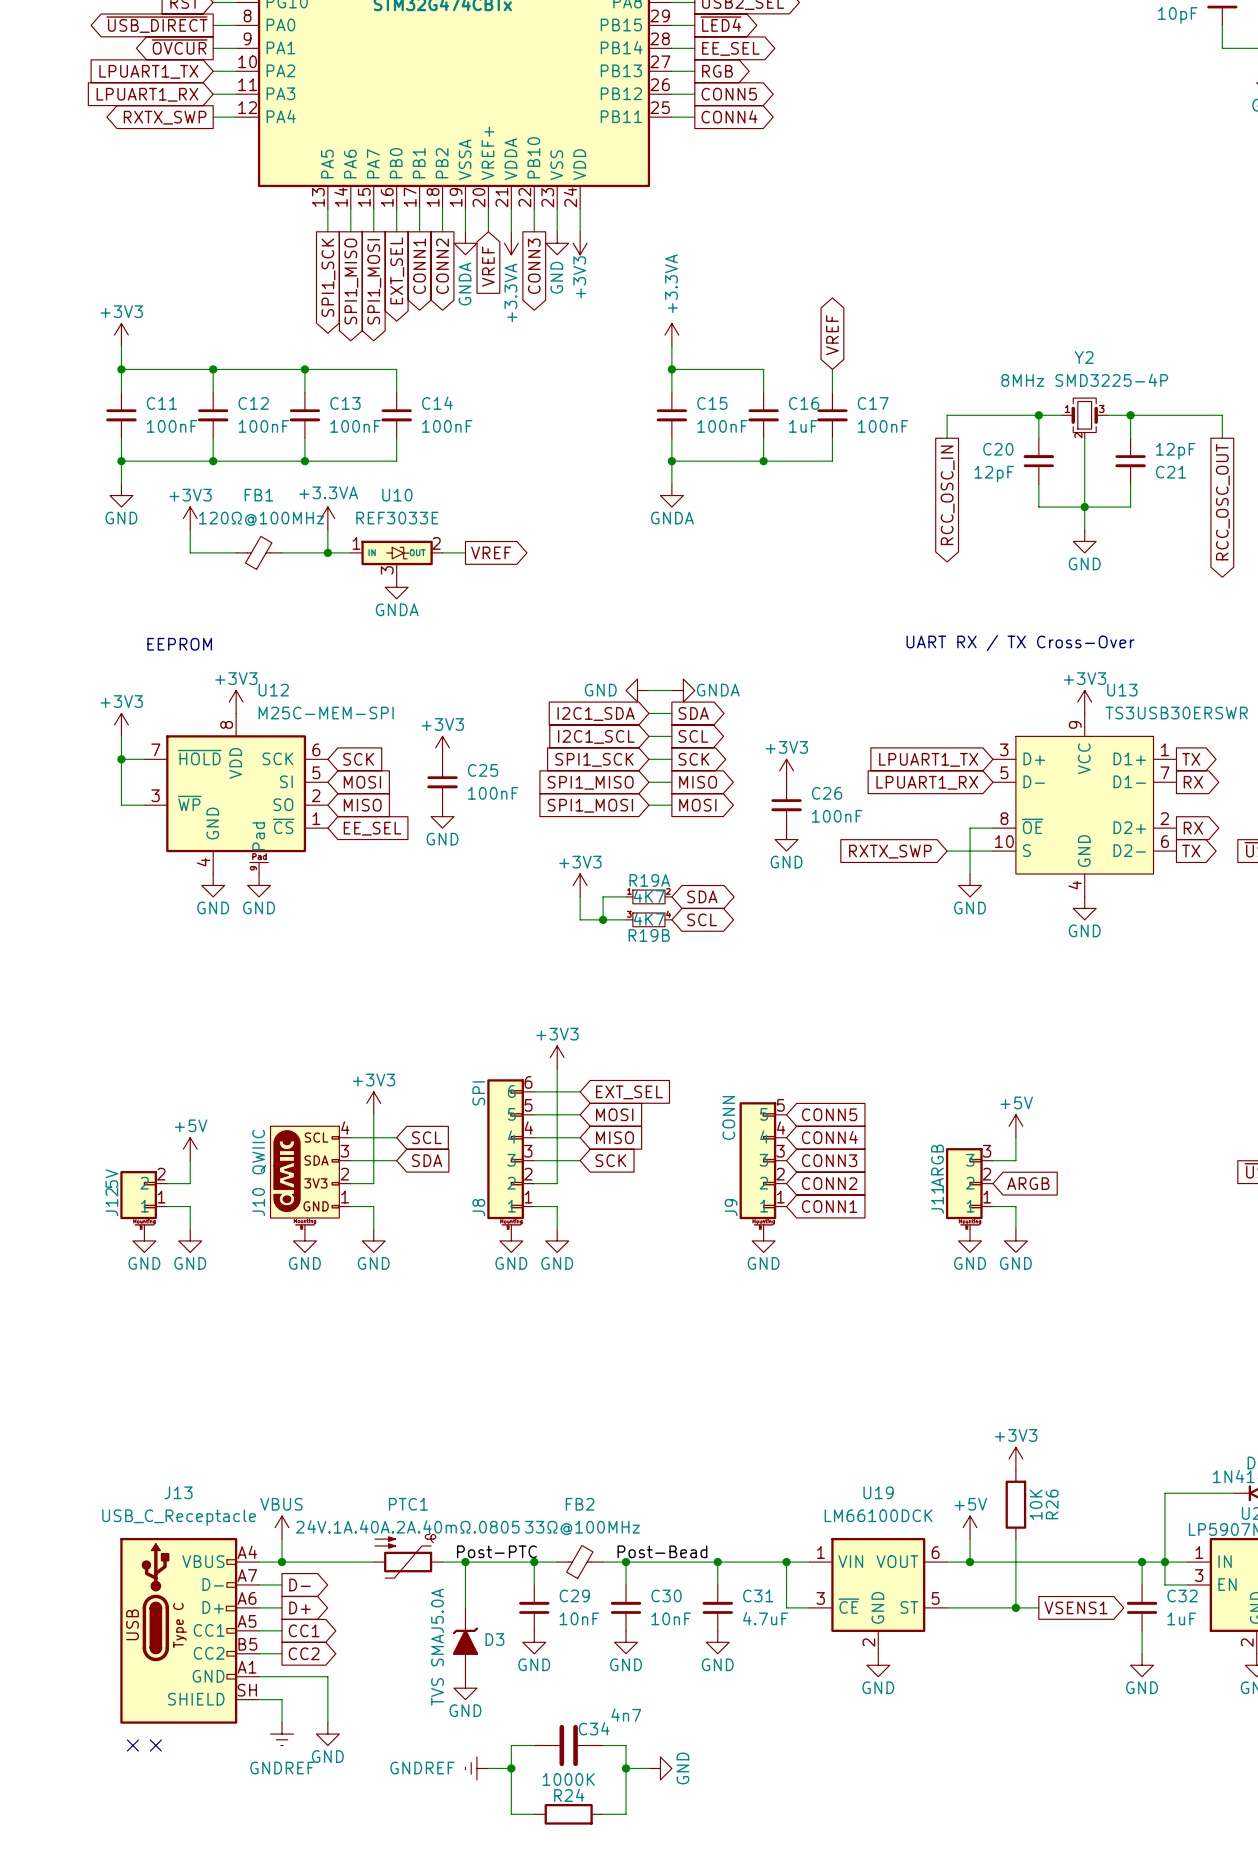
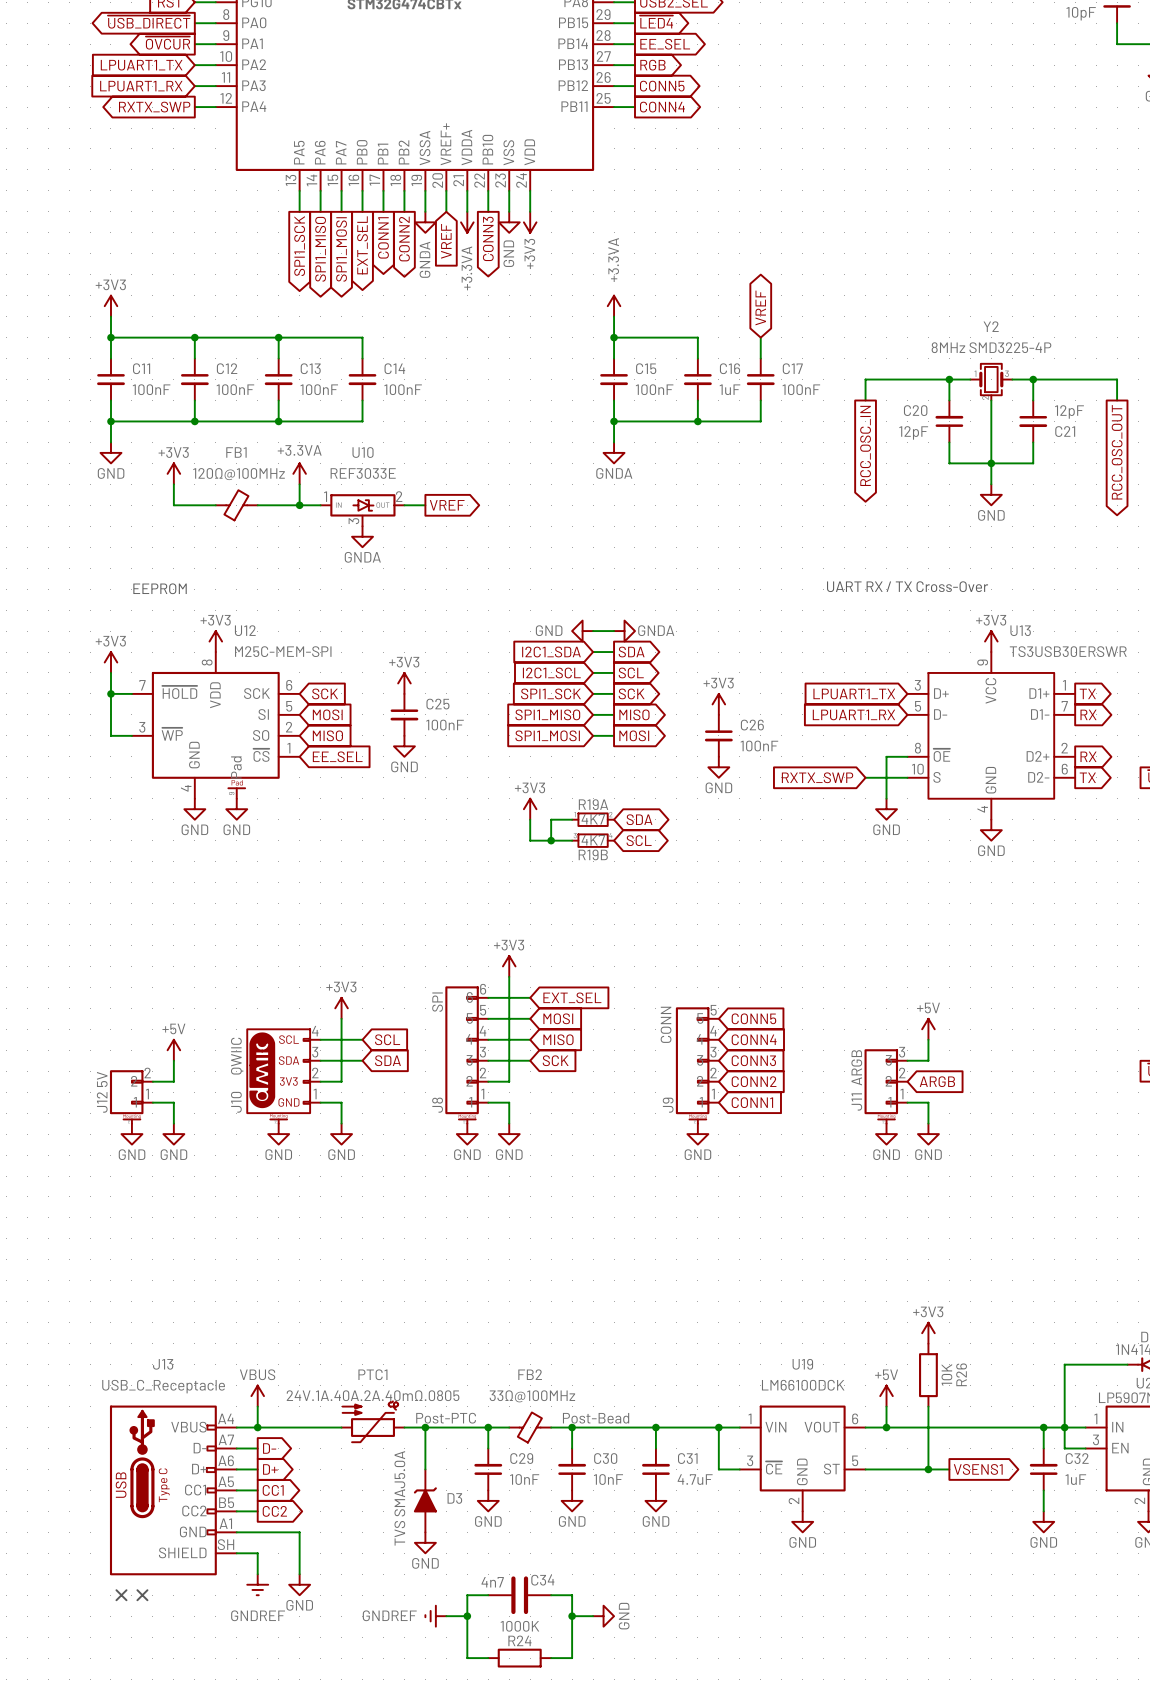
C34 value position: 4n7 (626, 1715) -> 4n7 (492, 1582)

